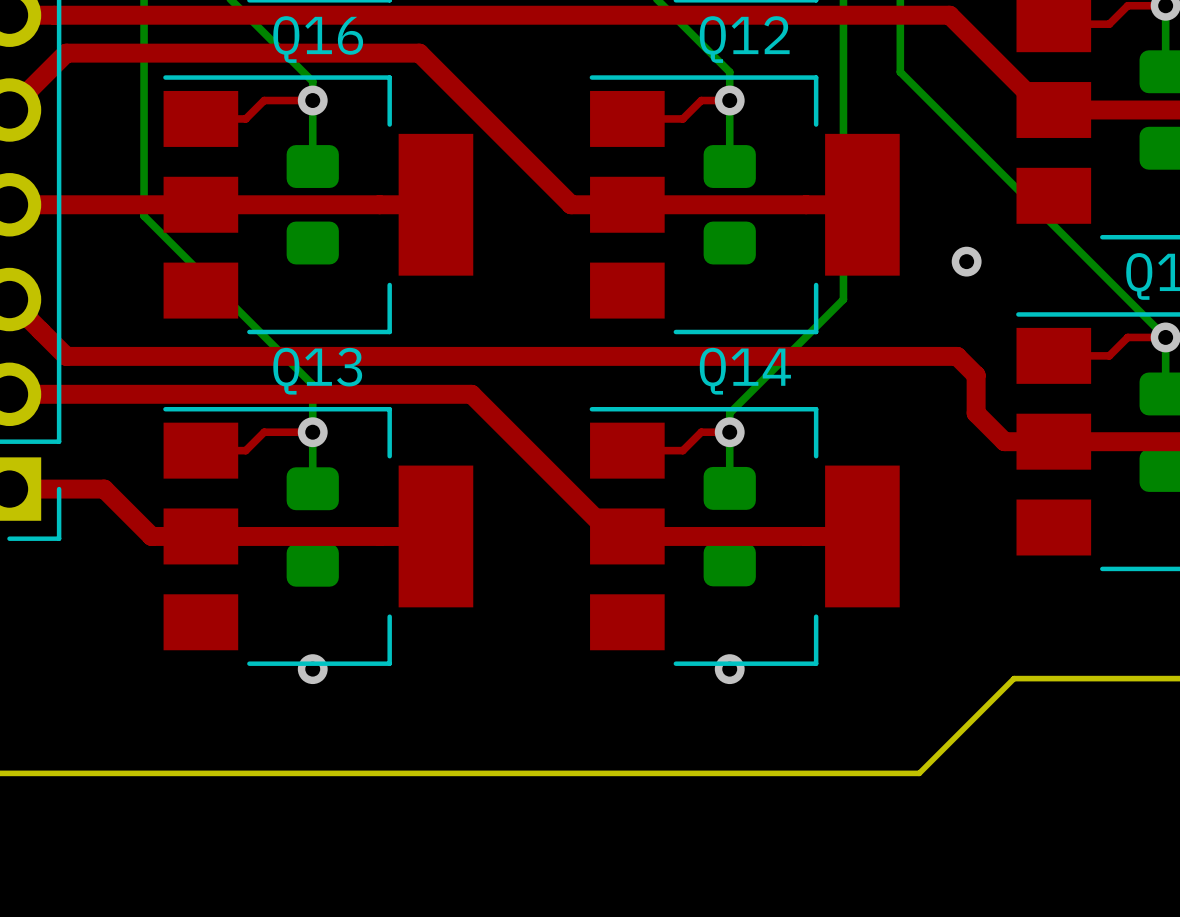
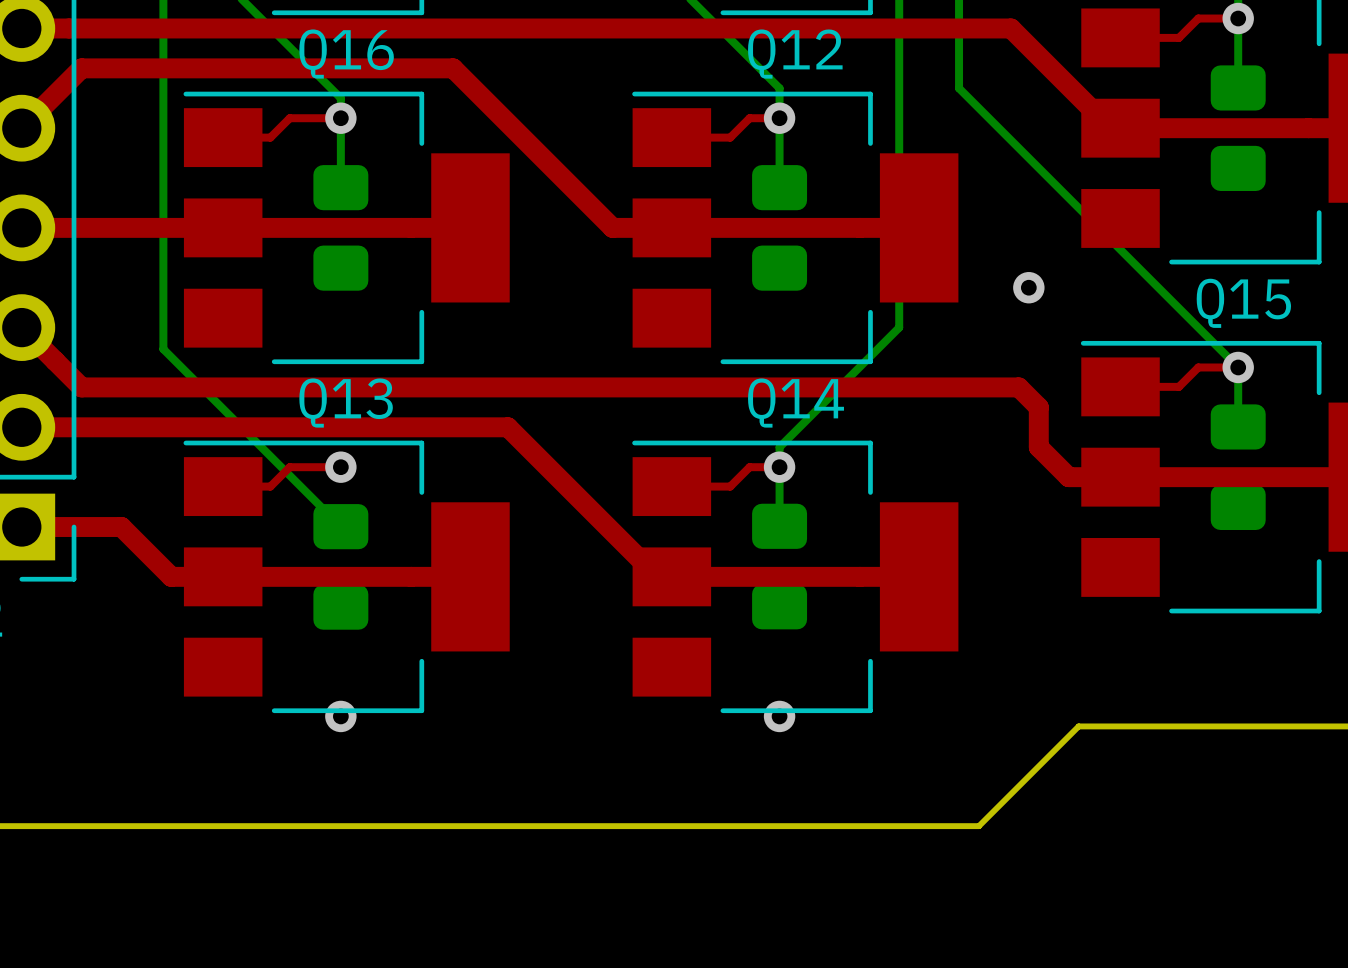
bottom track: (144, 216) (312, 384) (312, 488) -> (163, 239) (163, 349) (340, 526)

